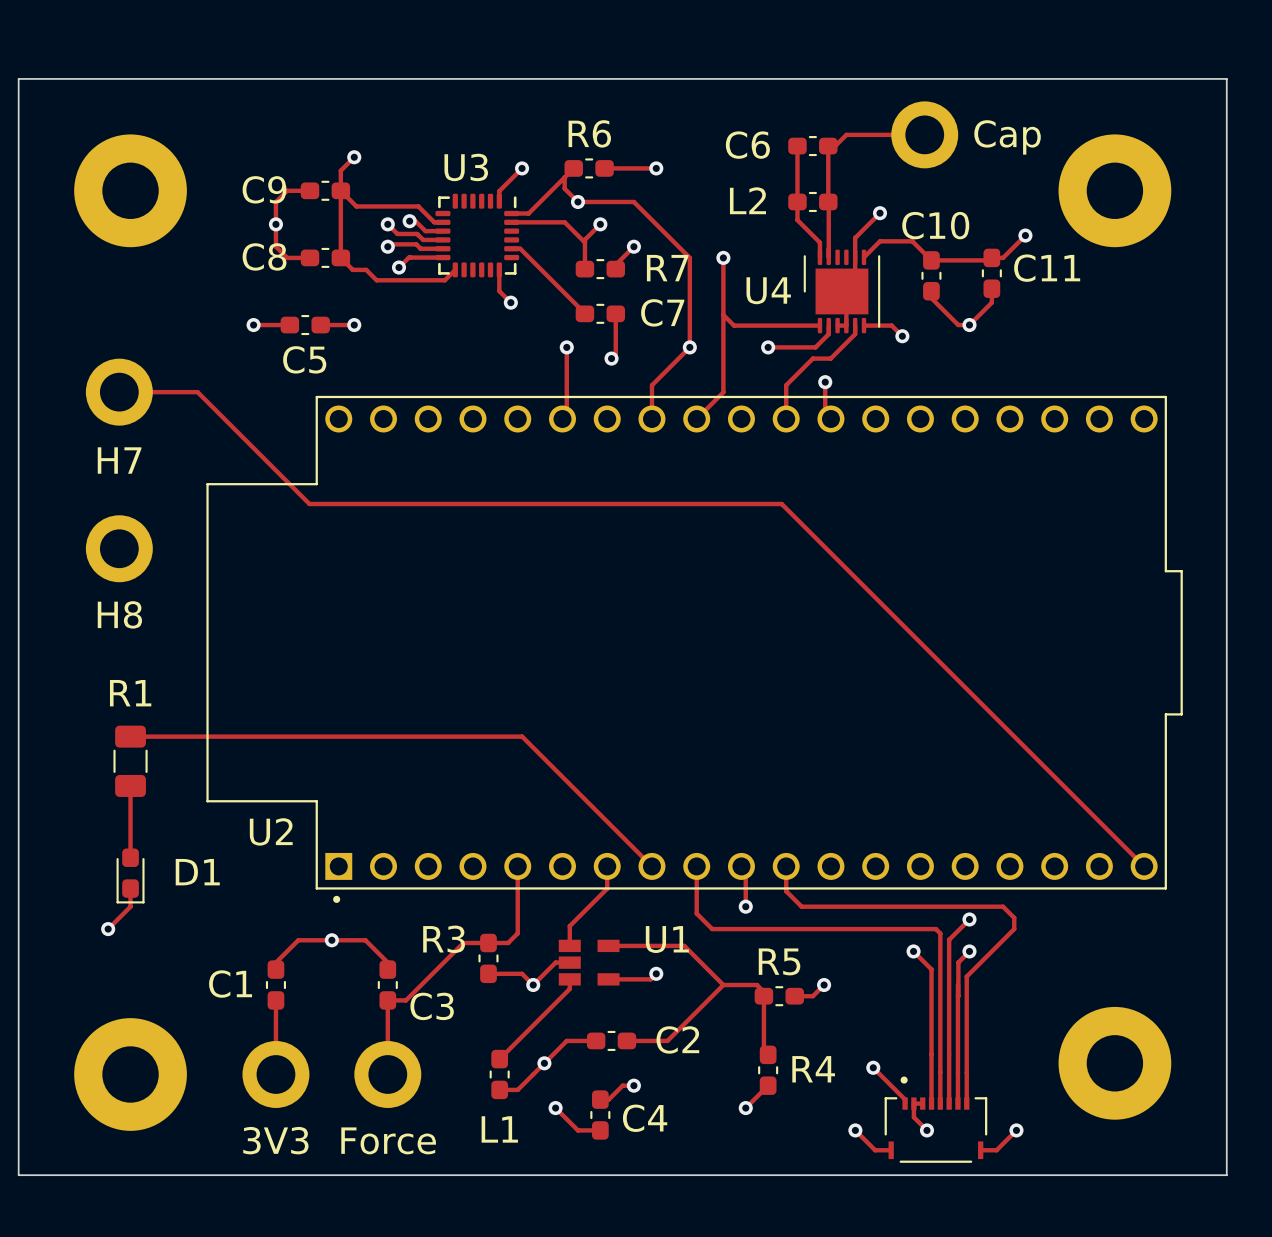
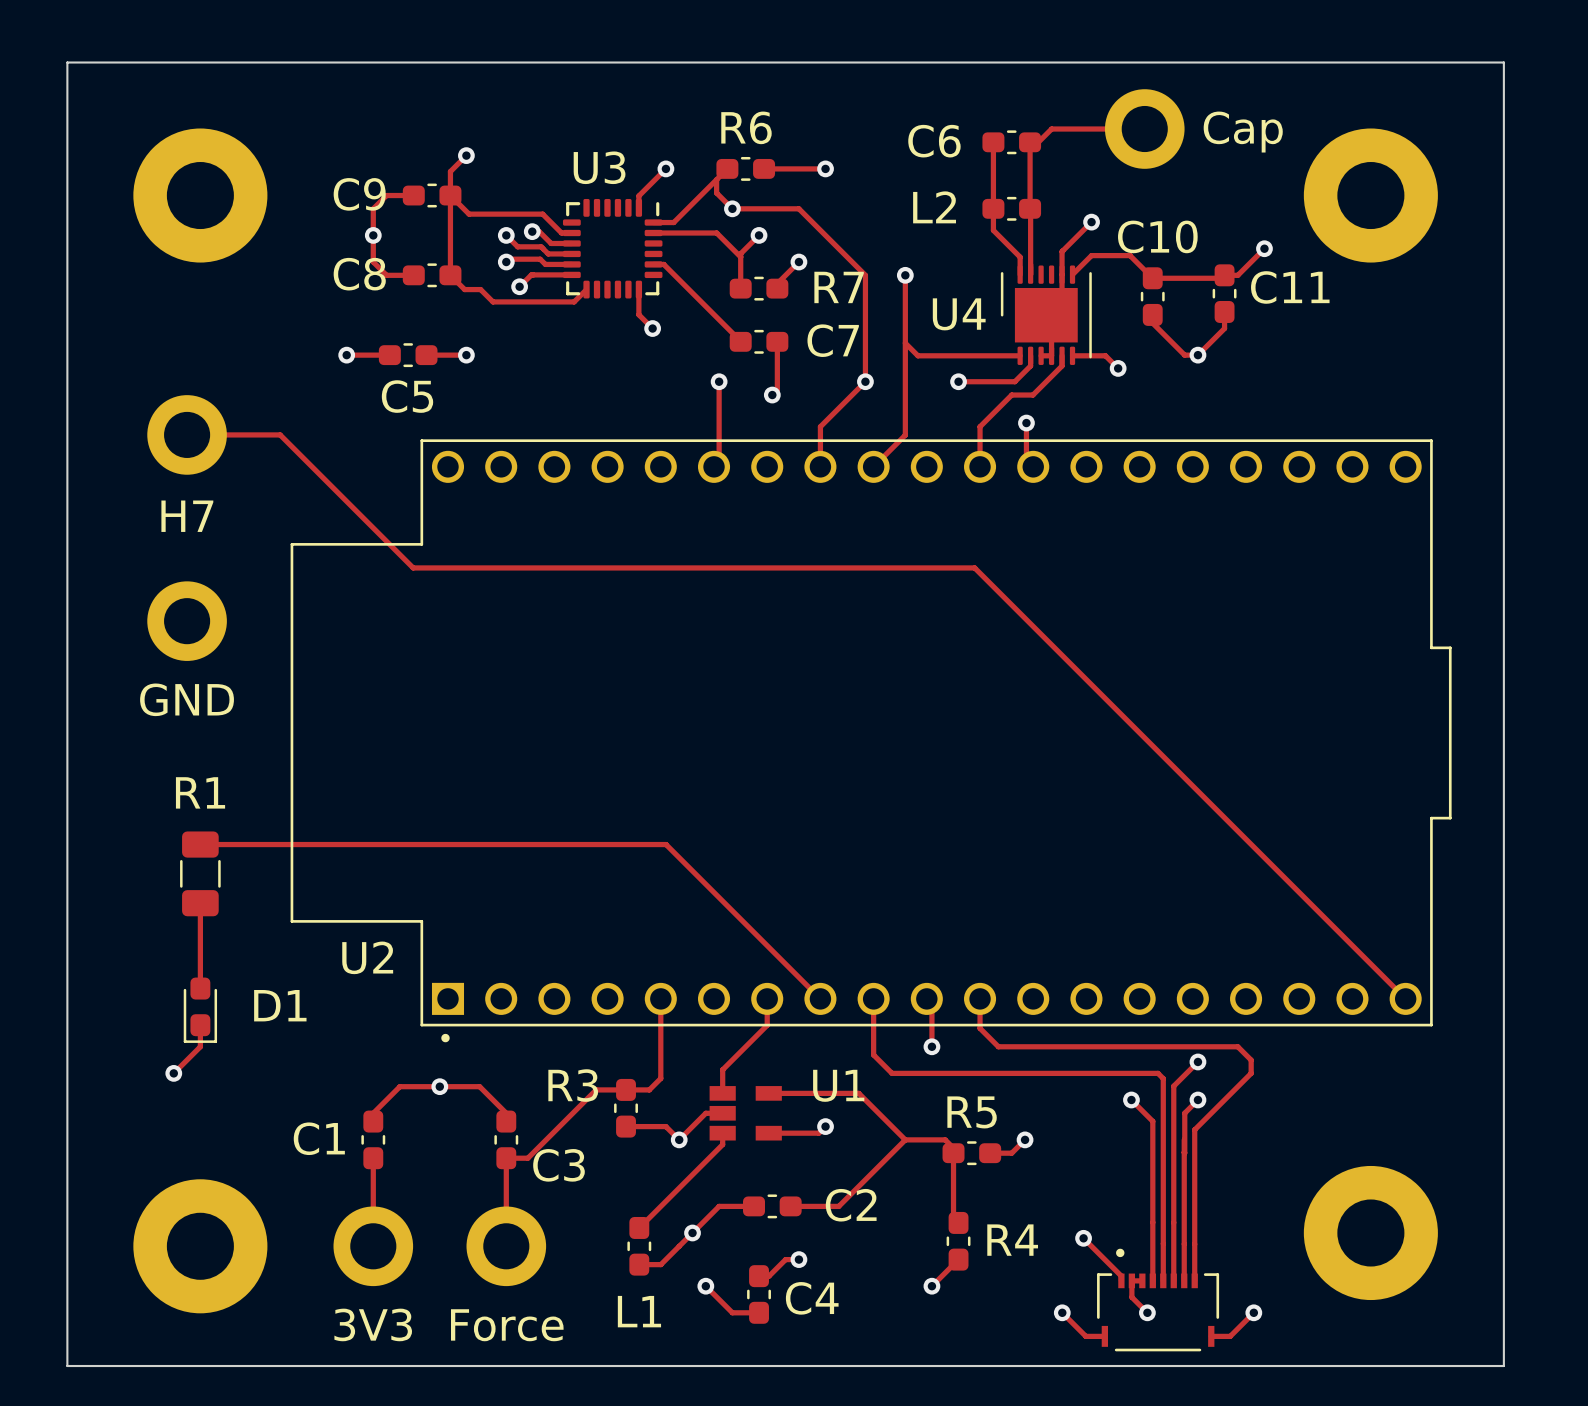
H8 name: H8 (119, 614) -> GND (187, 699)

